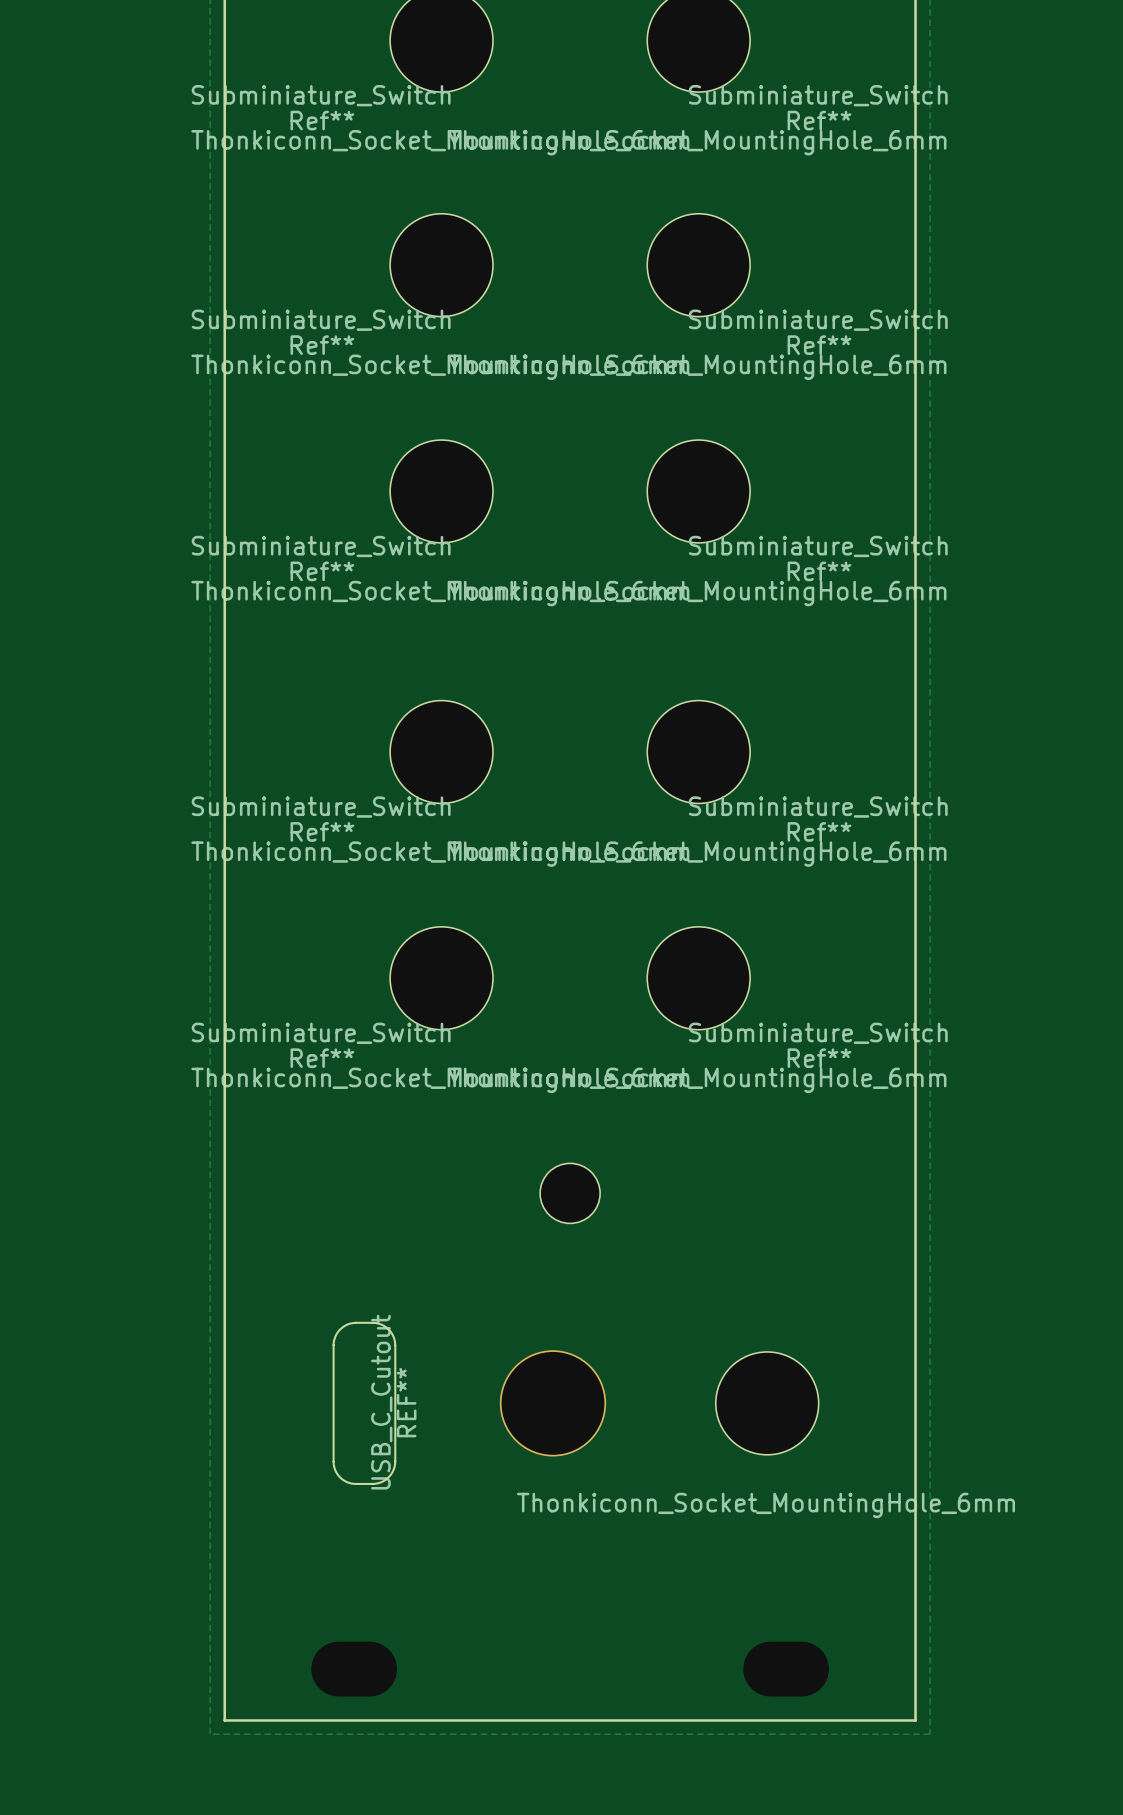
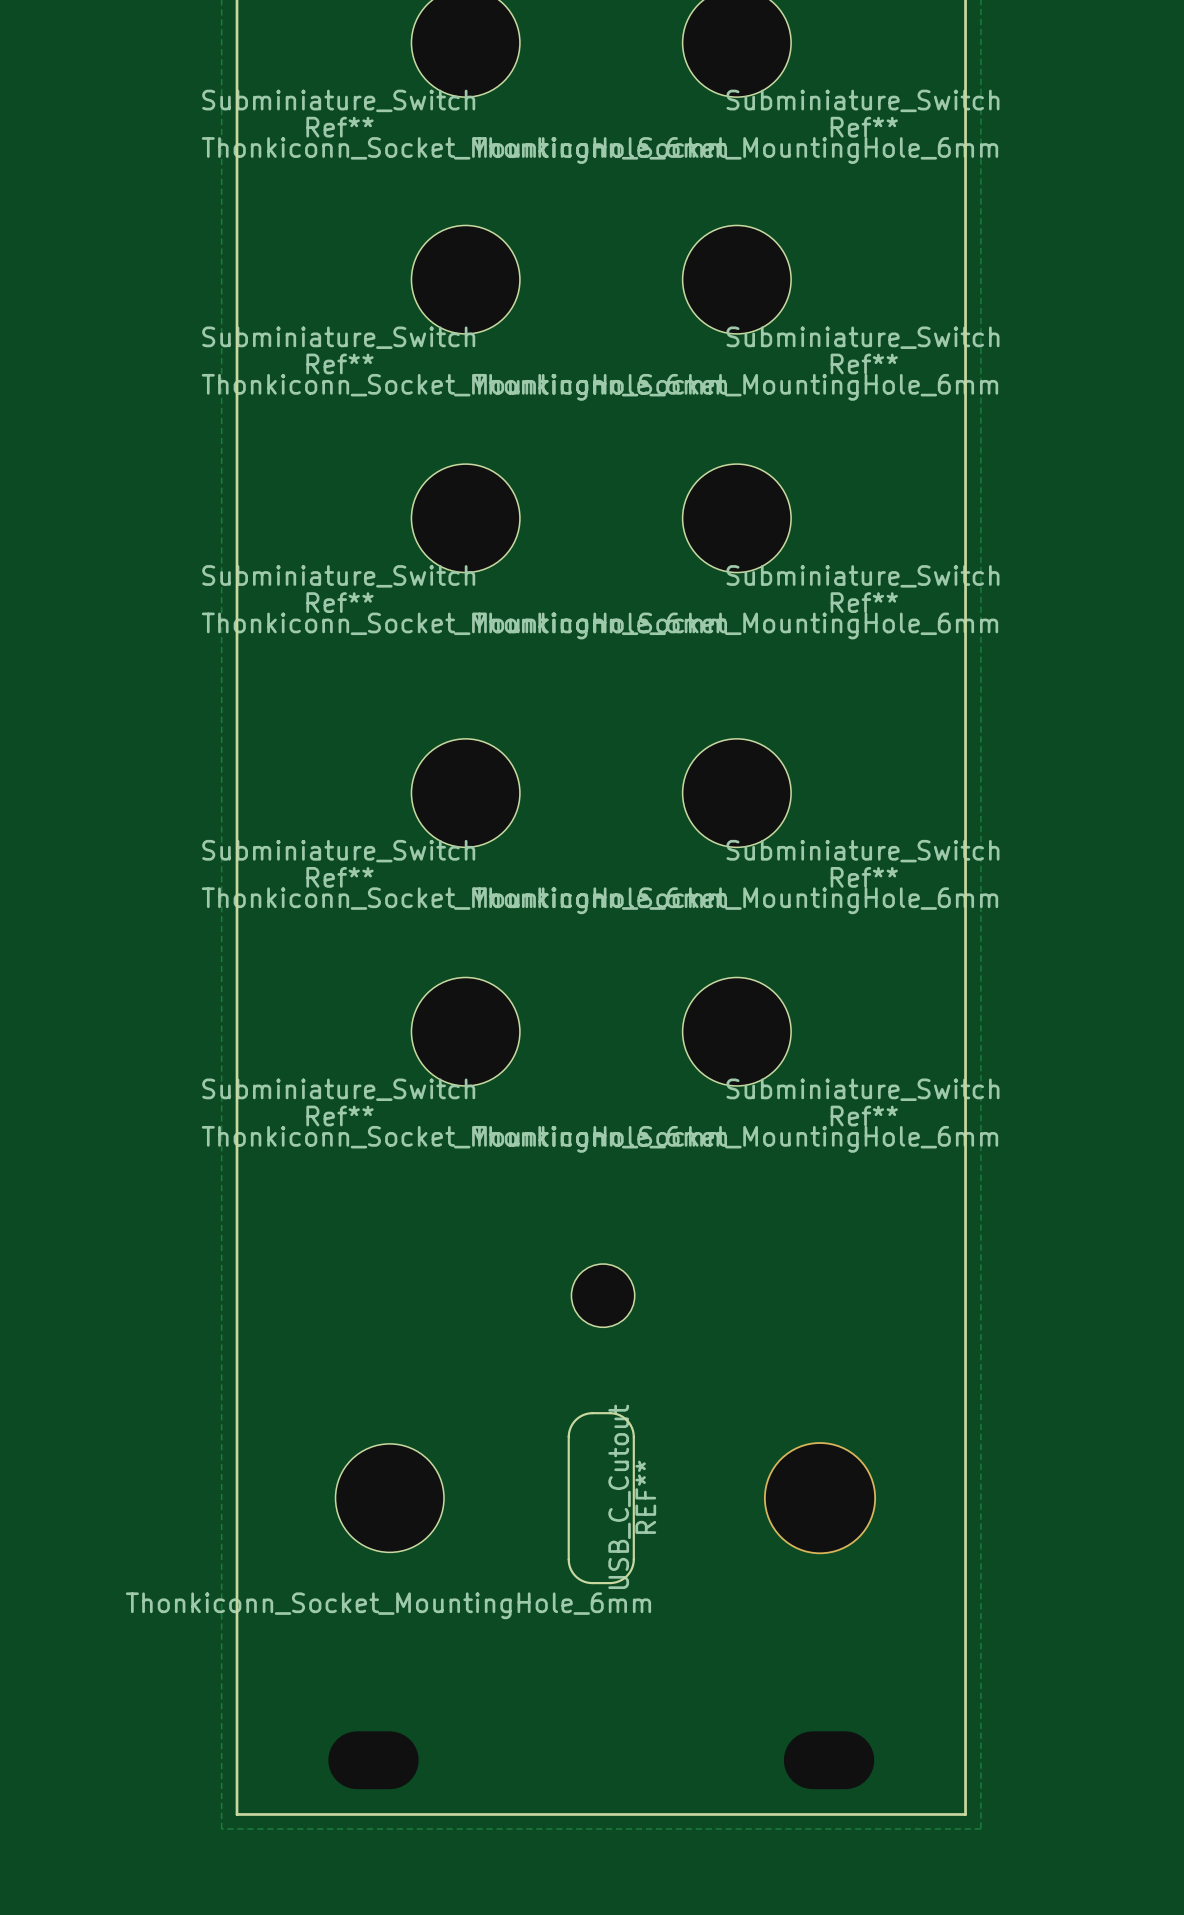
part position: (570, 1193) -> (603, 1295)
REF** position: (364, 1403) -> (601, 1498)
part position: (552, 1403) -> (820, 1498)
part position: (767, 1403) -> (389, 1498)

